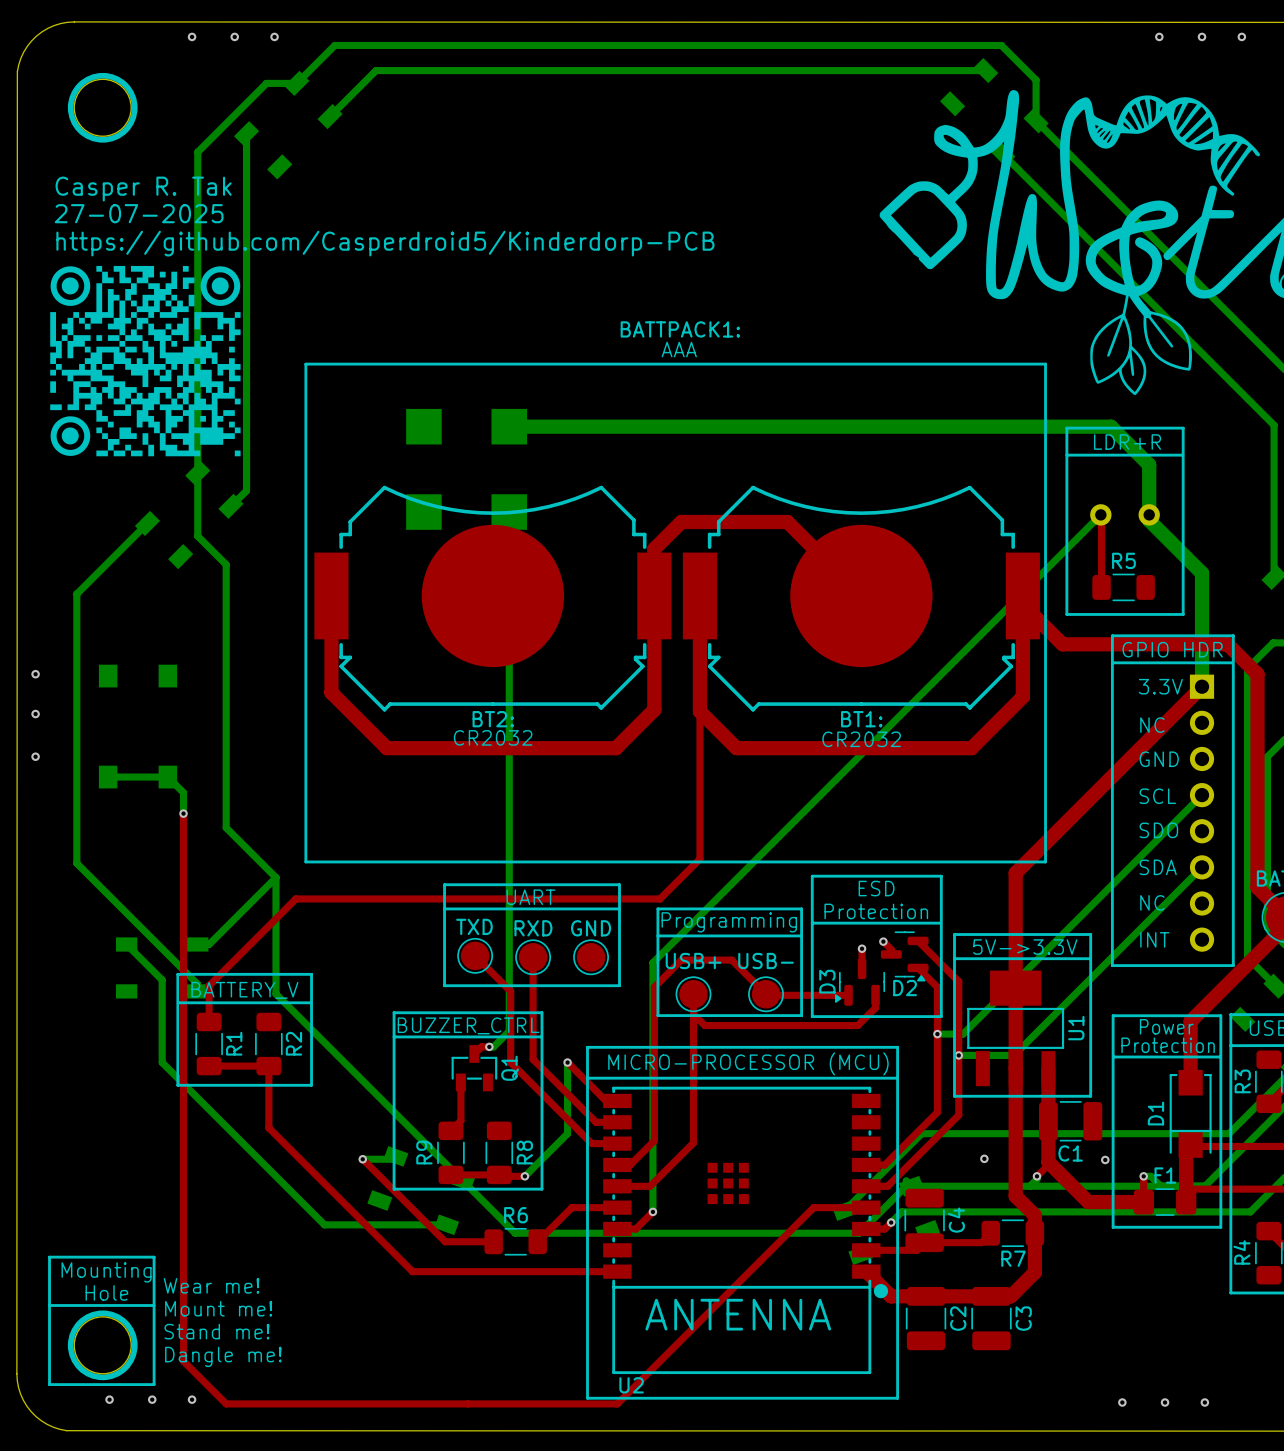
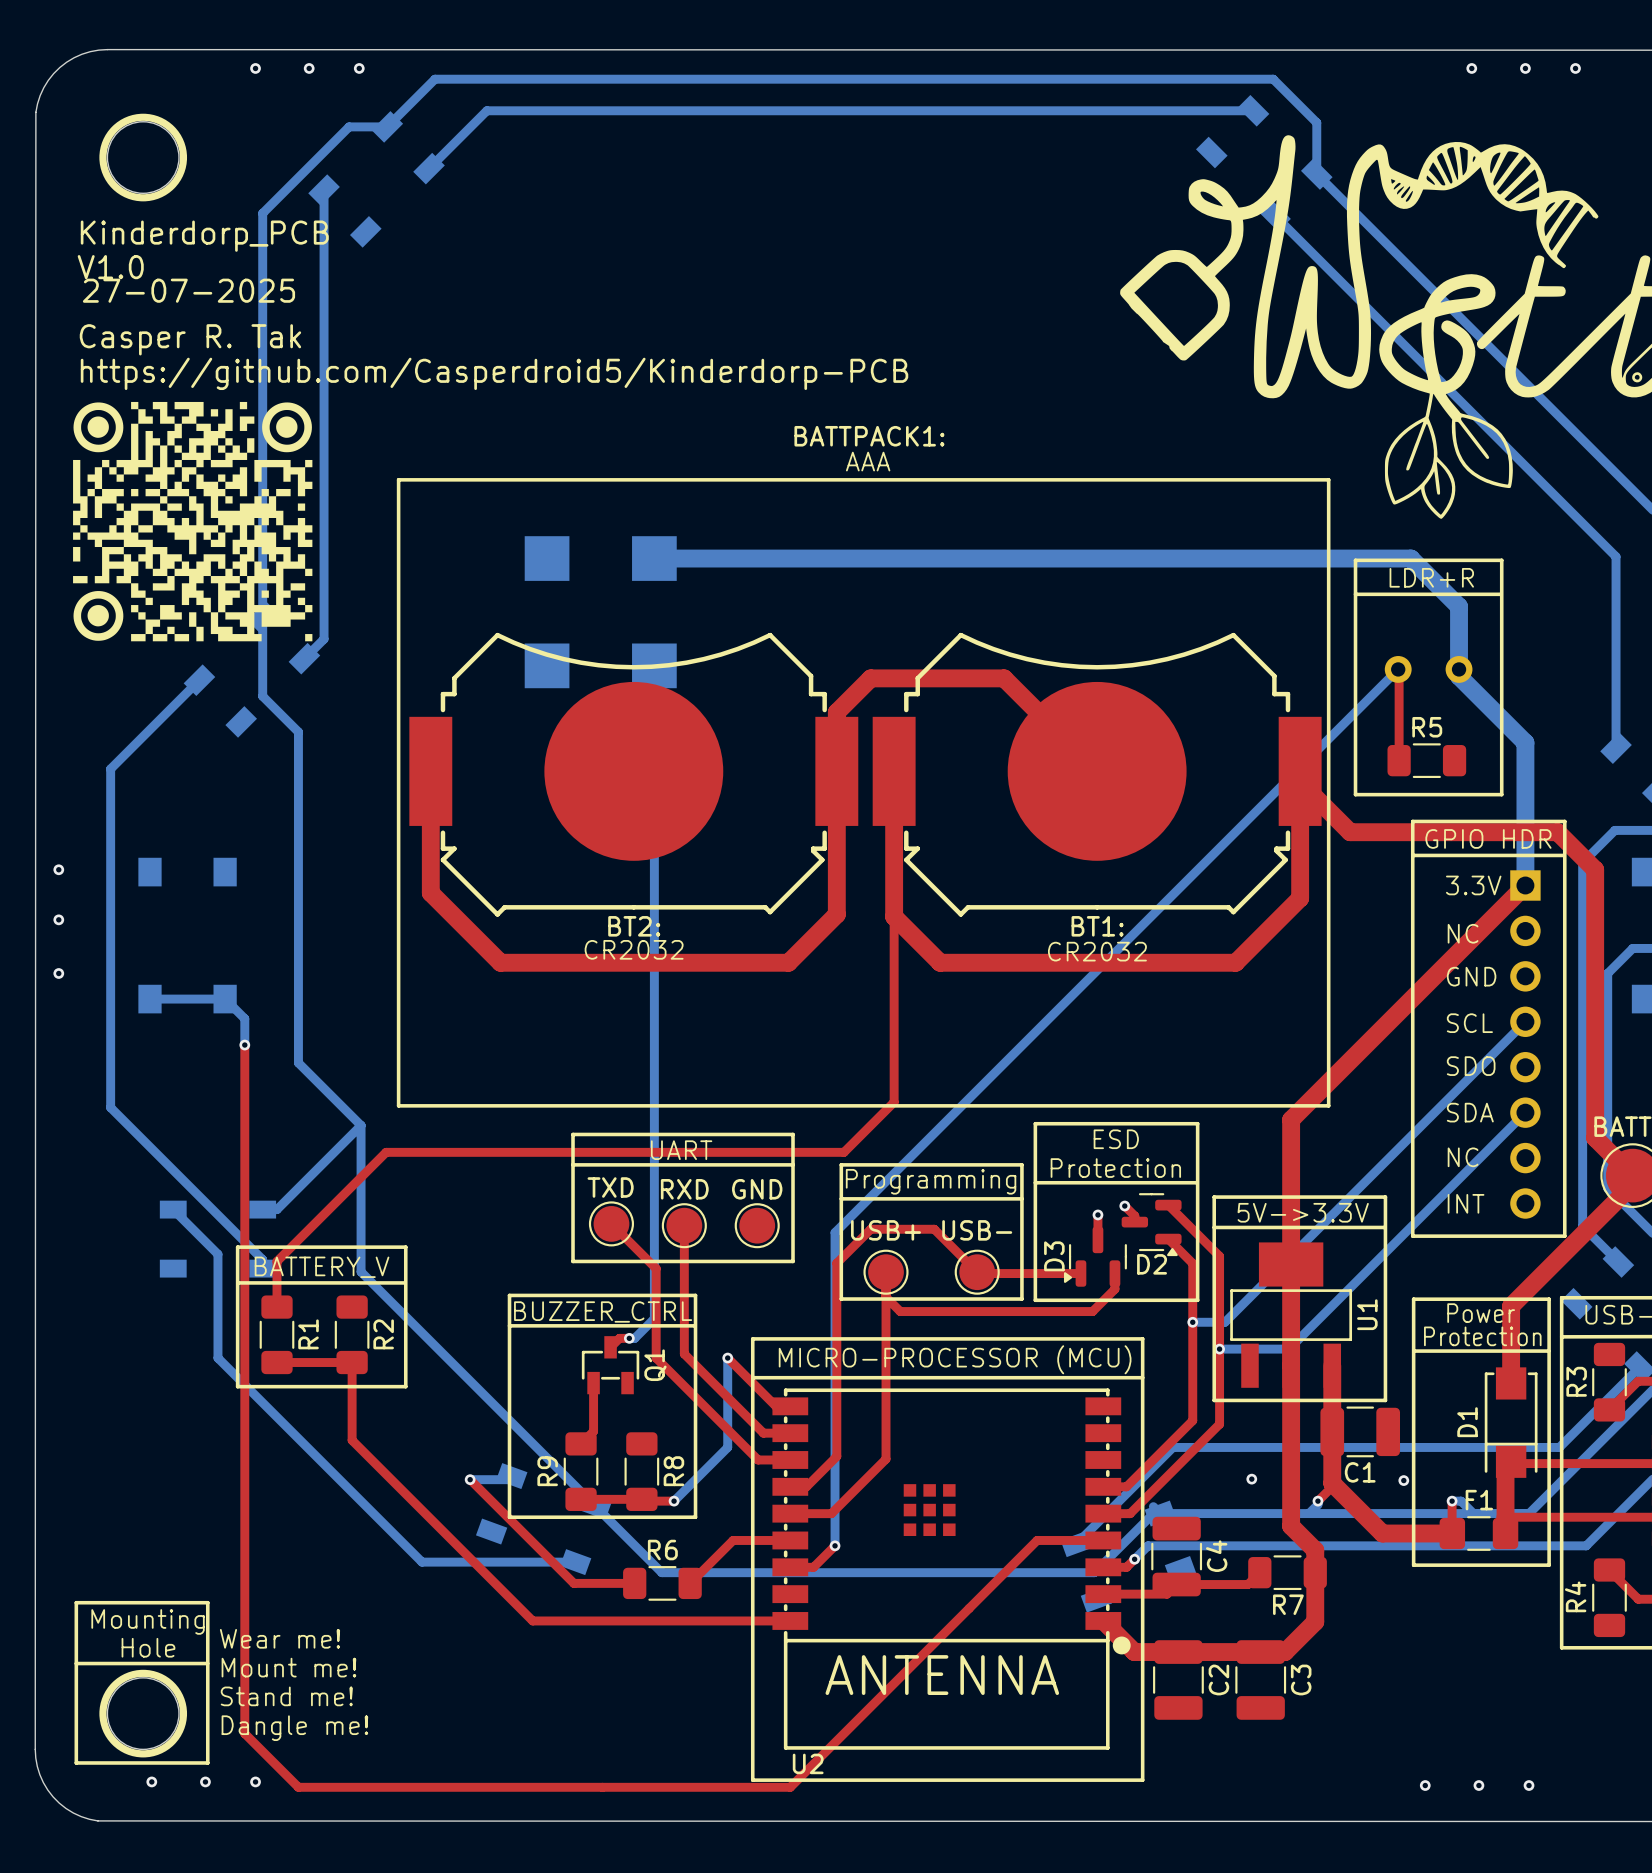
text: none -> Kinderdorp_PCB (204, 236)
text position: Casper R. Tak (143, 189) -> Casper R. Tak (190, 339)
text: none -> V1.0 (110, 267)
text position: https://github.com/Casperdroid5/Kinderdorp-PCB (385, 243) -> https://github.com/Casperdroid5/Kinderdorp-PCB (494, 373)
drawing position: (145, 361) -> (192, 521)

